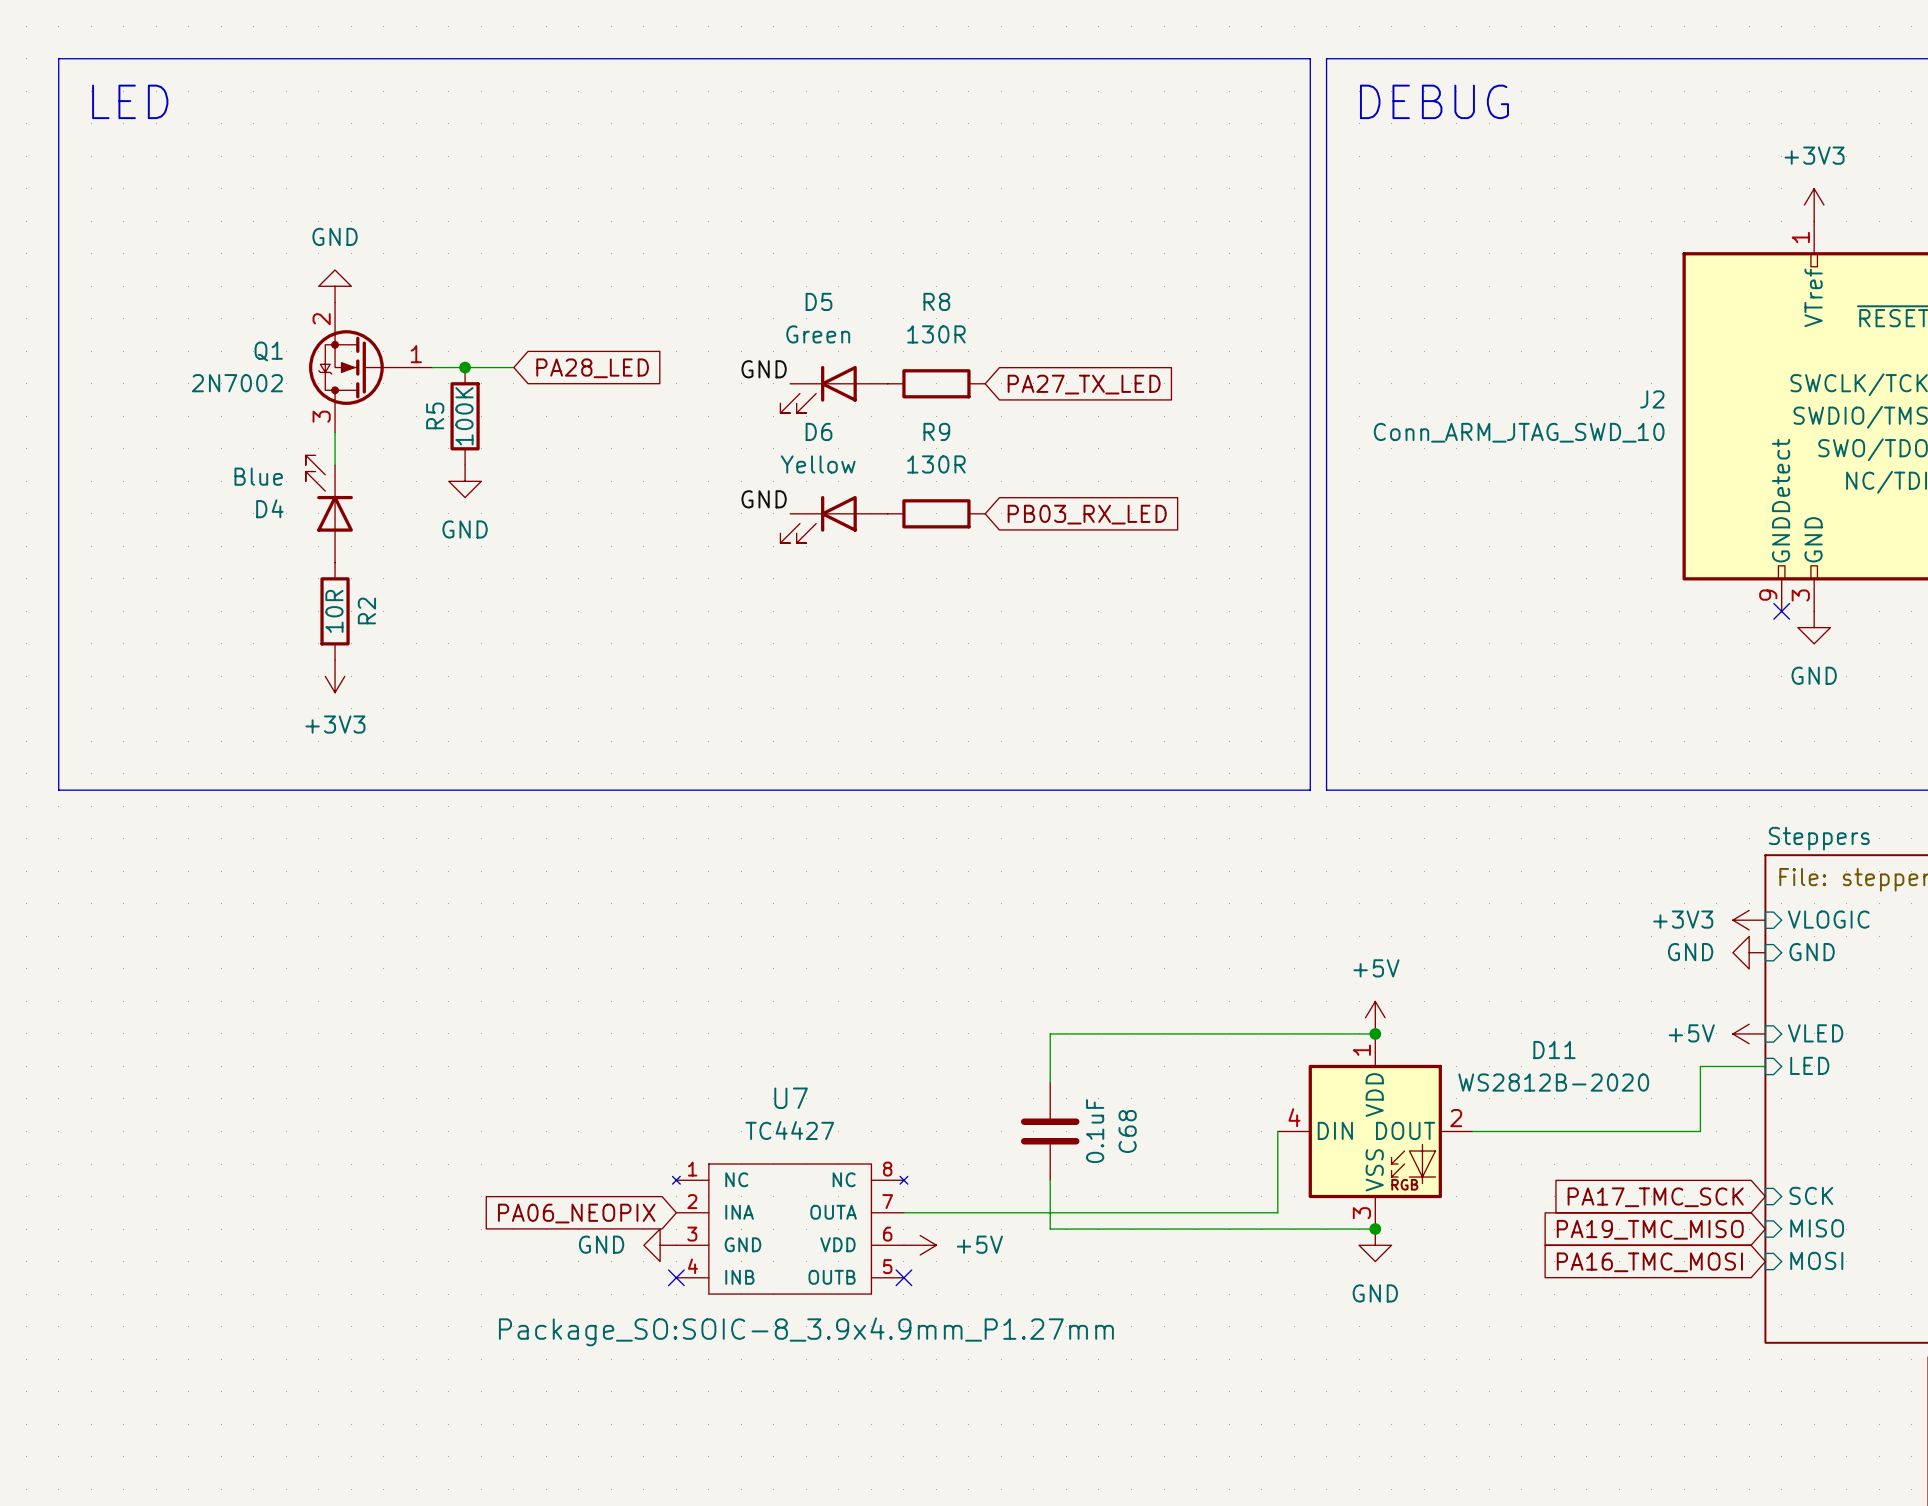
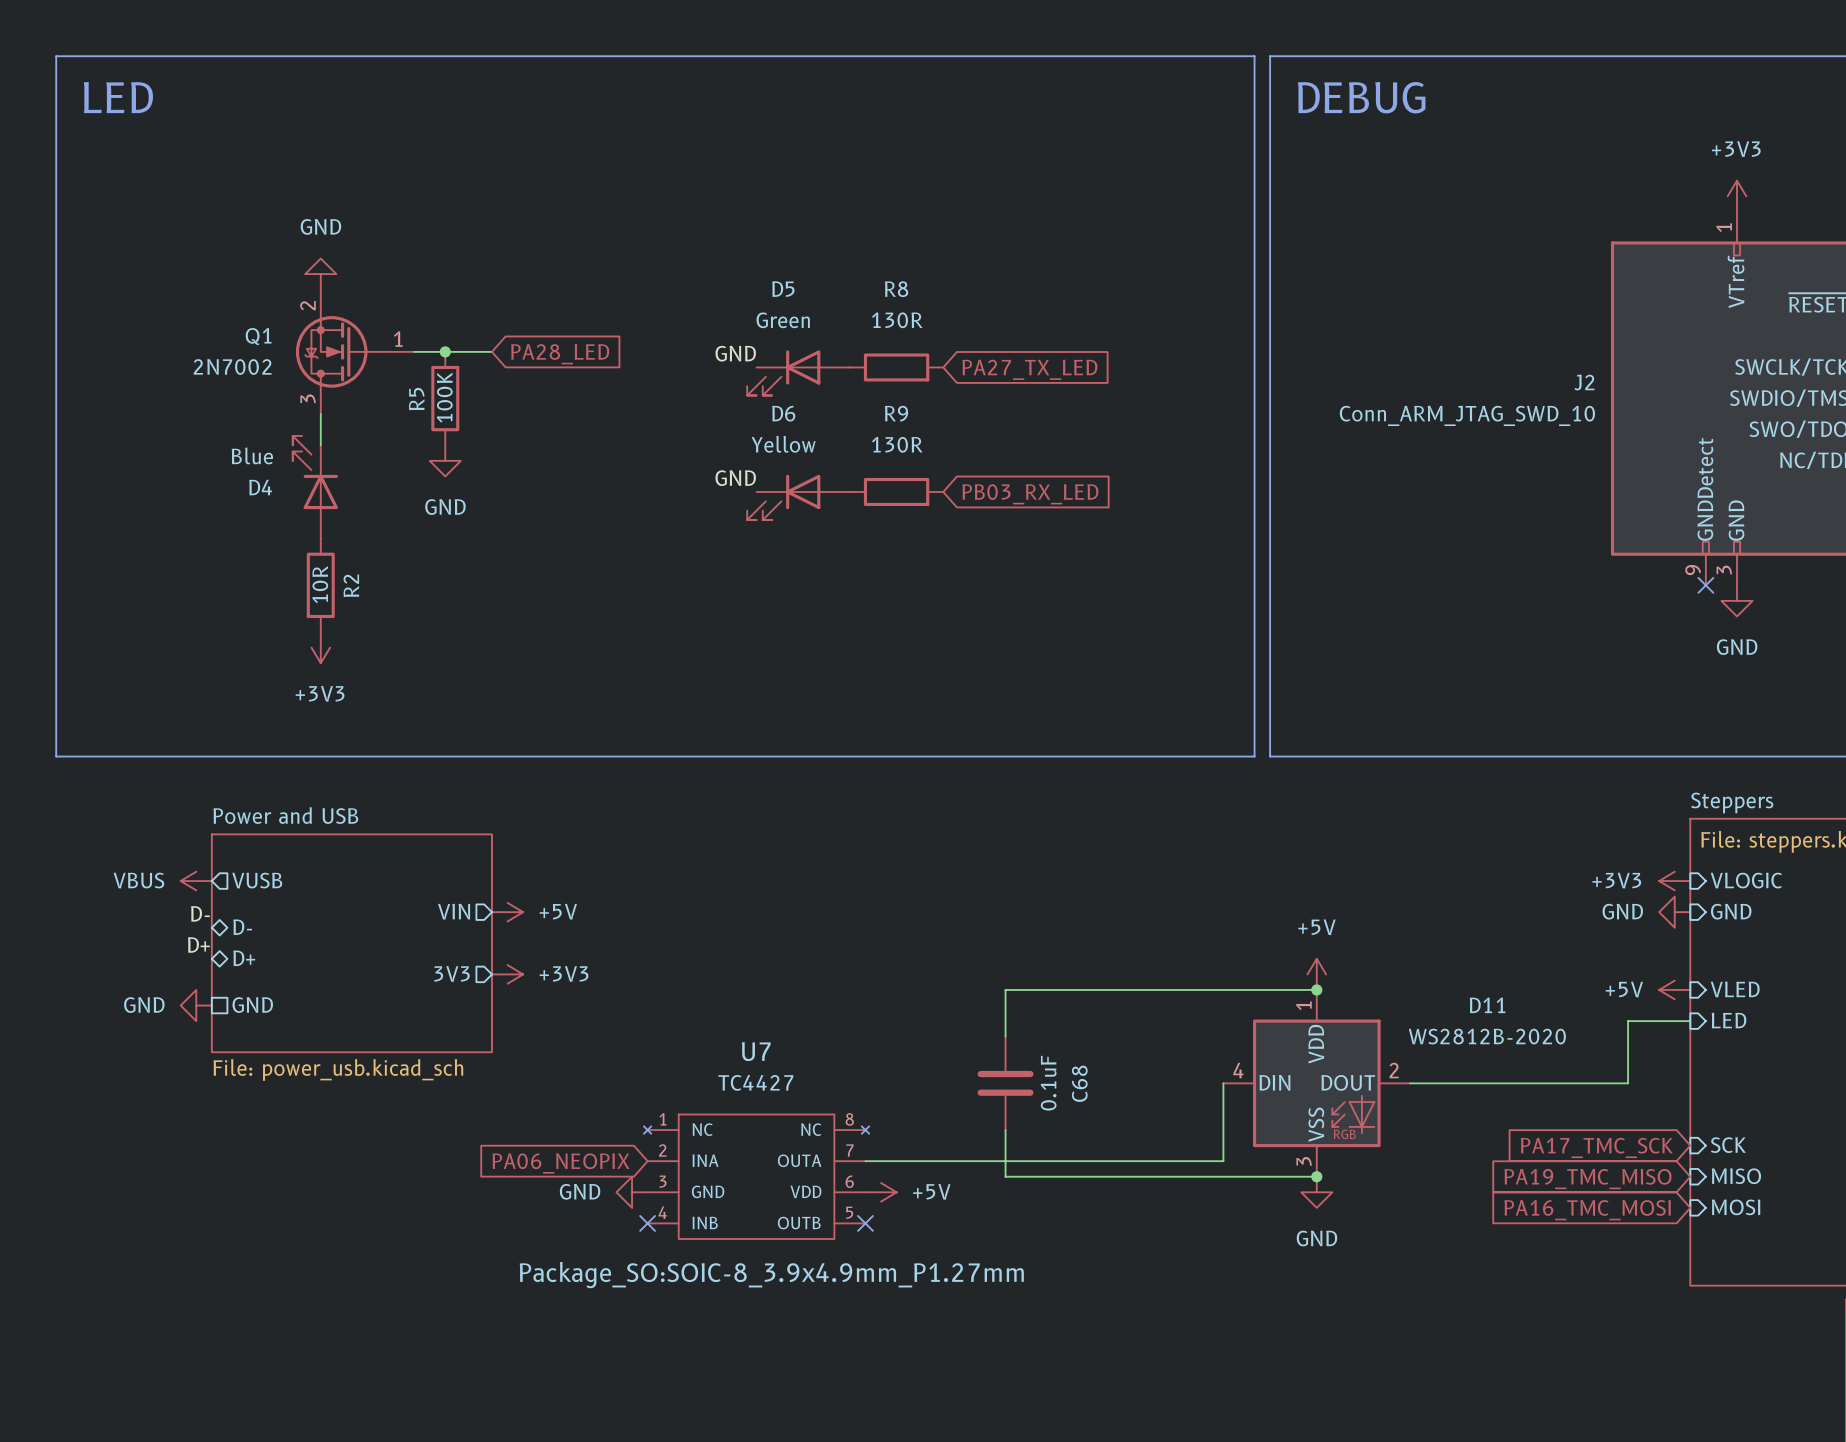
sheet pin: none -> VUSB (257, 880)
power symbol: none -> VBUS (196, 881)
sheet pin: none -> VIN (454, 911)
power symbol: none -> +5V (507, 912)
label: none -> D- (200, 913)
sheet pin: none -> D- (242, 927)
sheet Power and USB: none -> File: power_usb.kicad_sch (351, 943)
label: none -> D+ (198, 945)
sheet pin: none -> D+ (244, 958)
sheet pin: none -> 3V3 (452, 973)
power symbol: none -> +3V3 (507, 974)
sheet pin: none -> GND (252, 1005)
power symbol: none -> GND (196, 1005)

